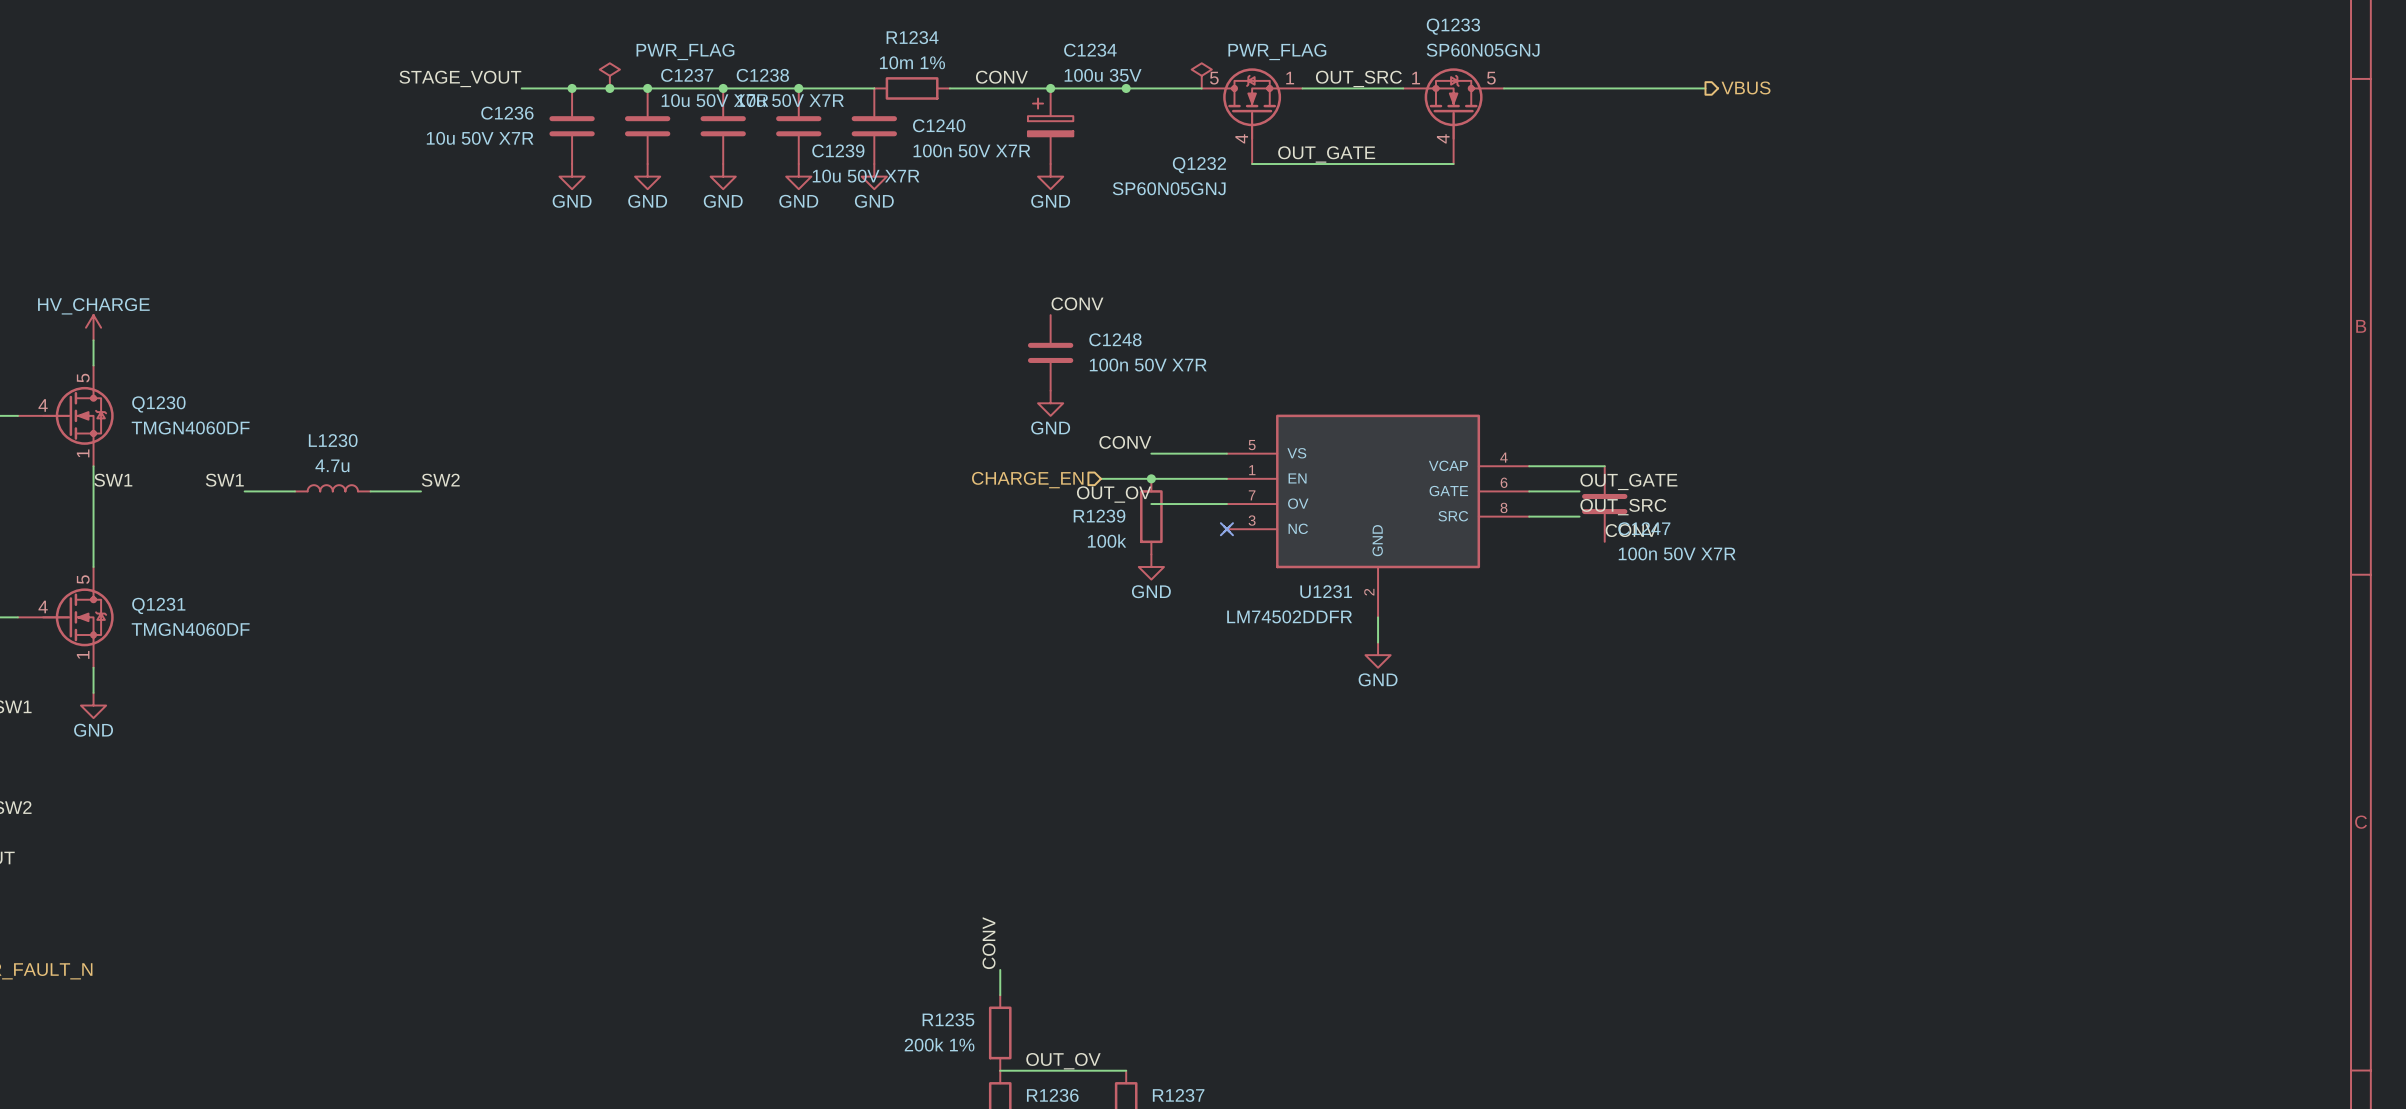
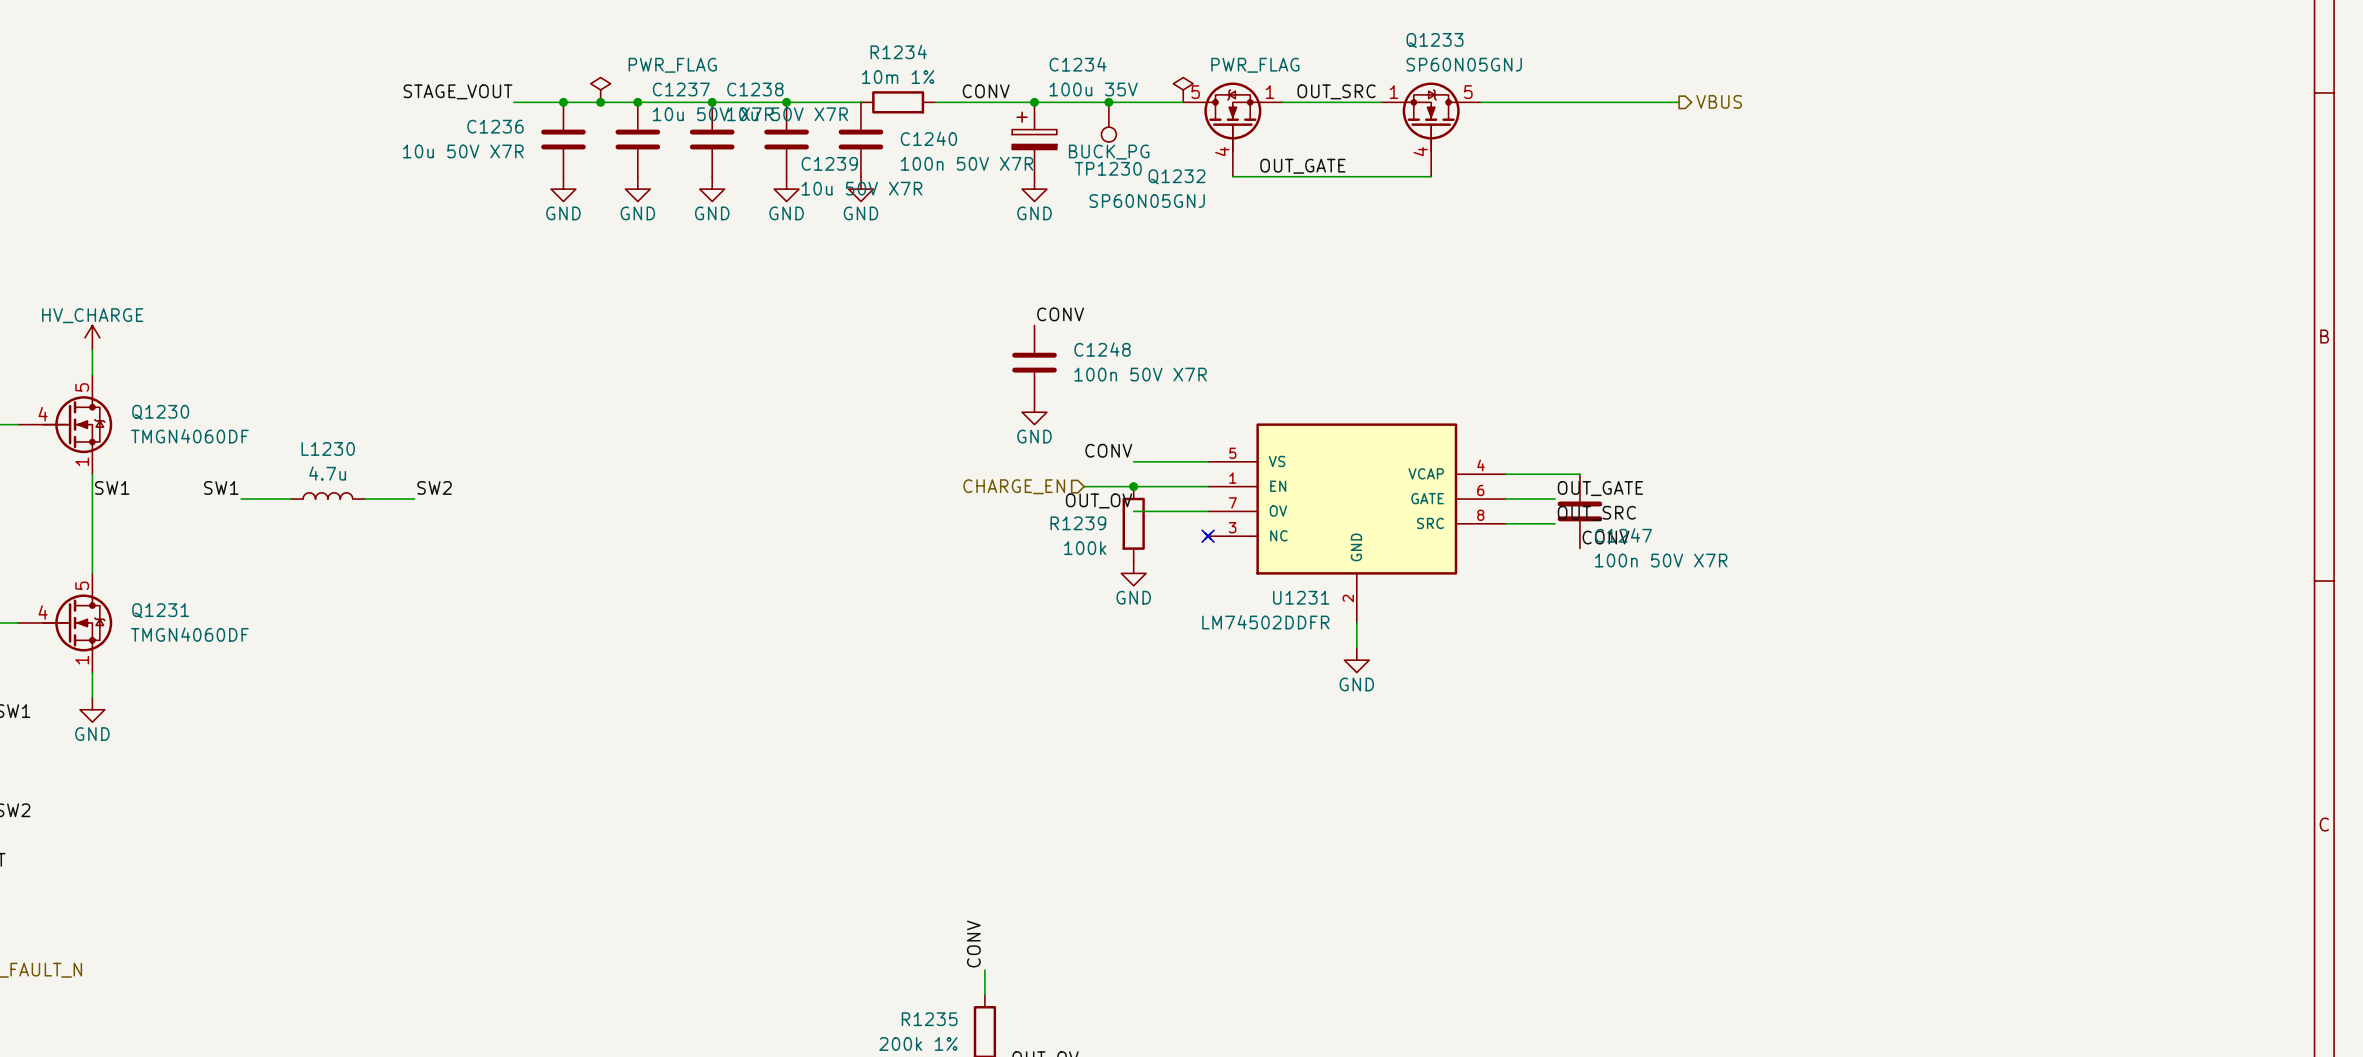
TP1230: none -> BUCK_PG (1108, 122)

